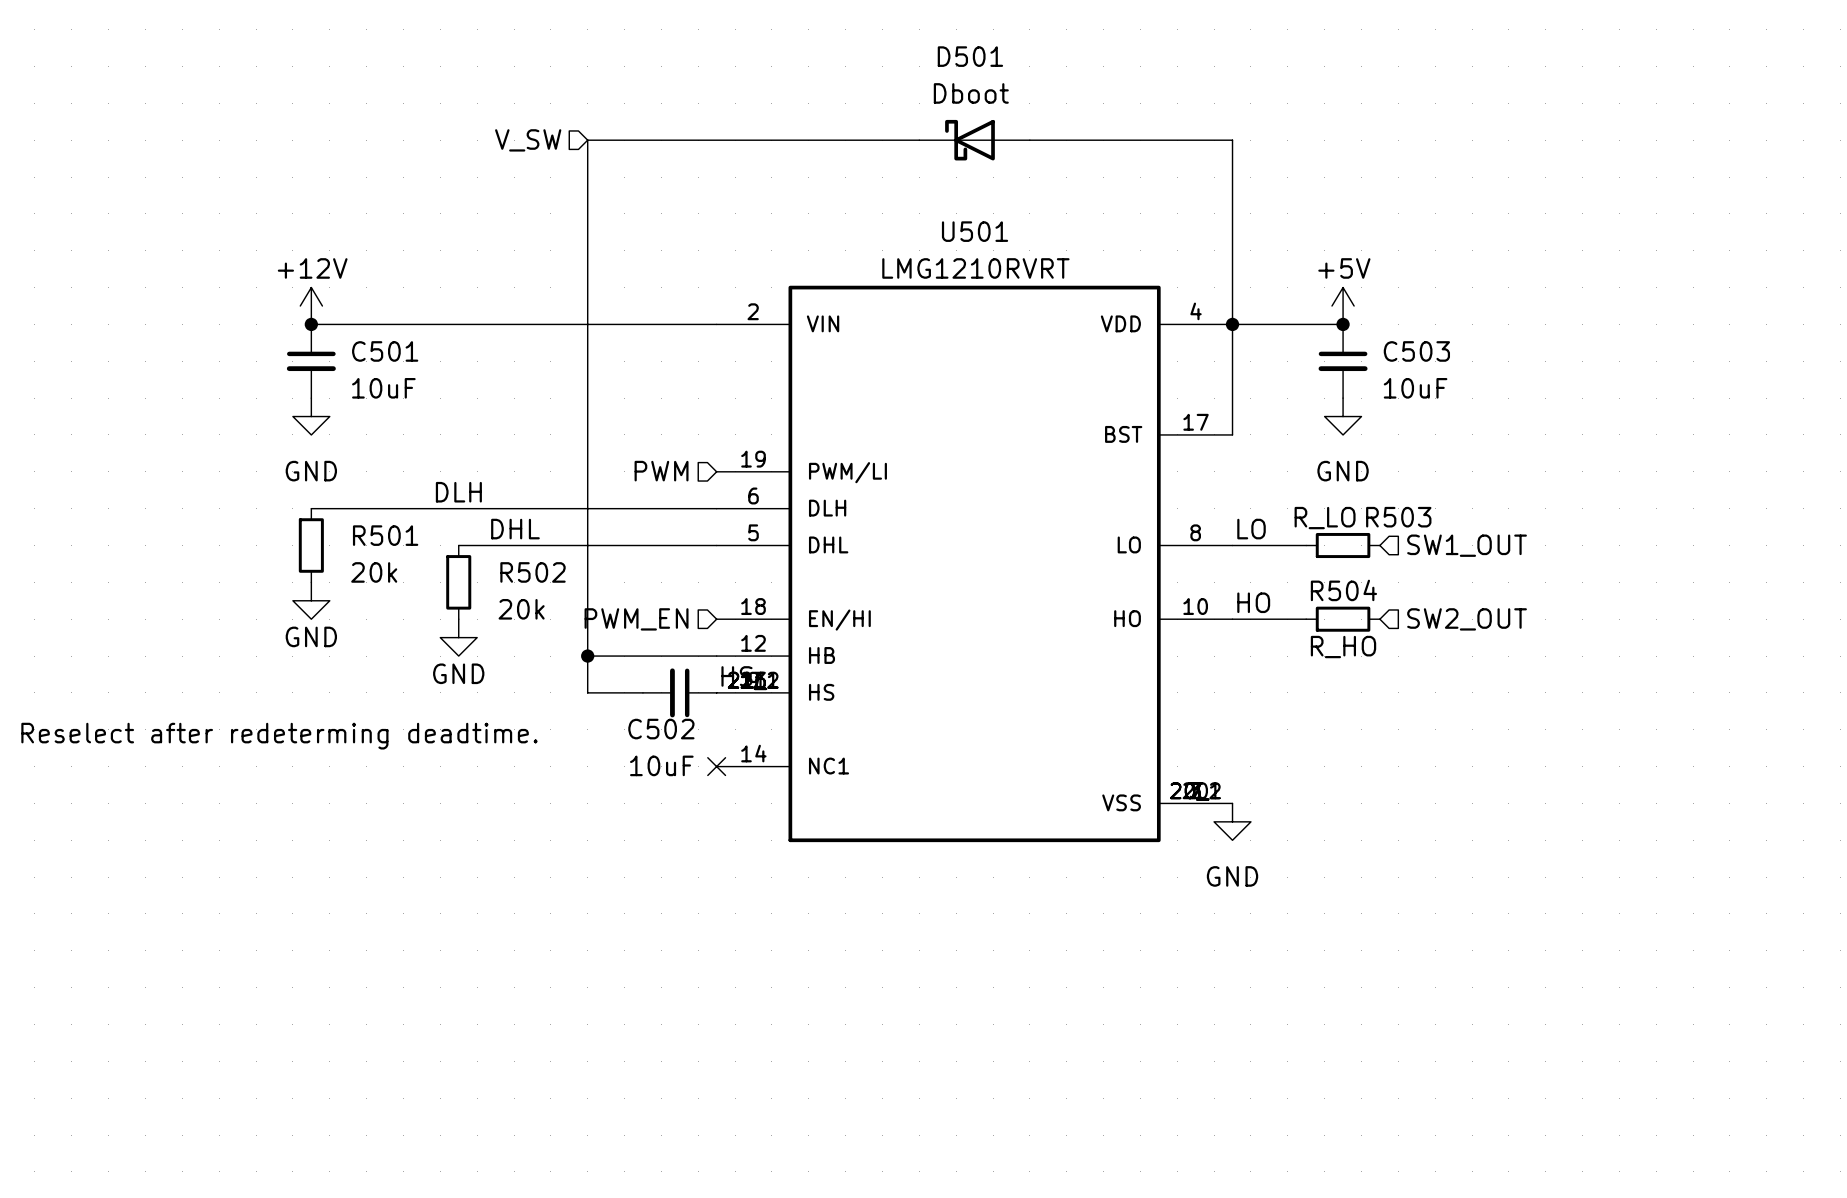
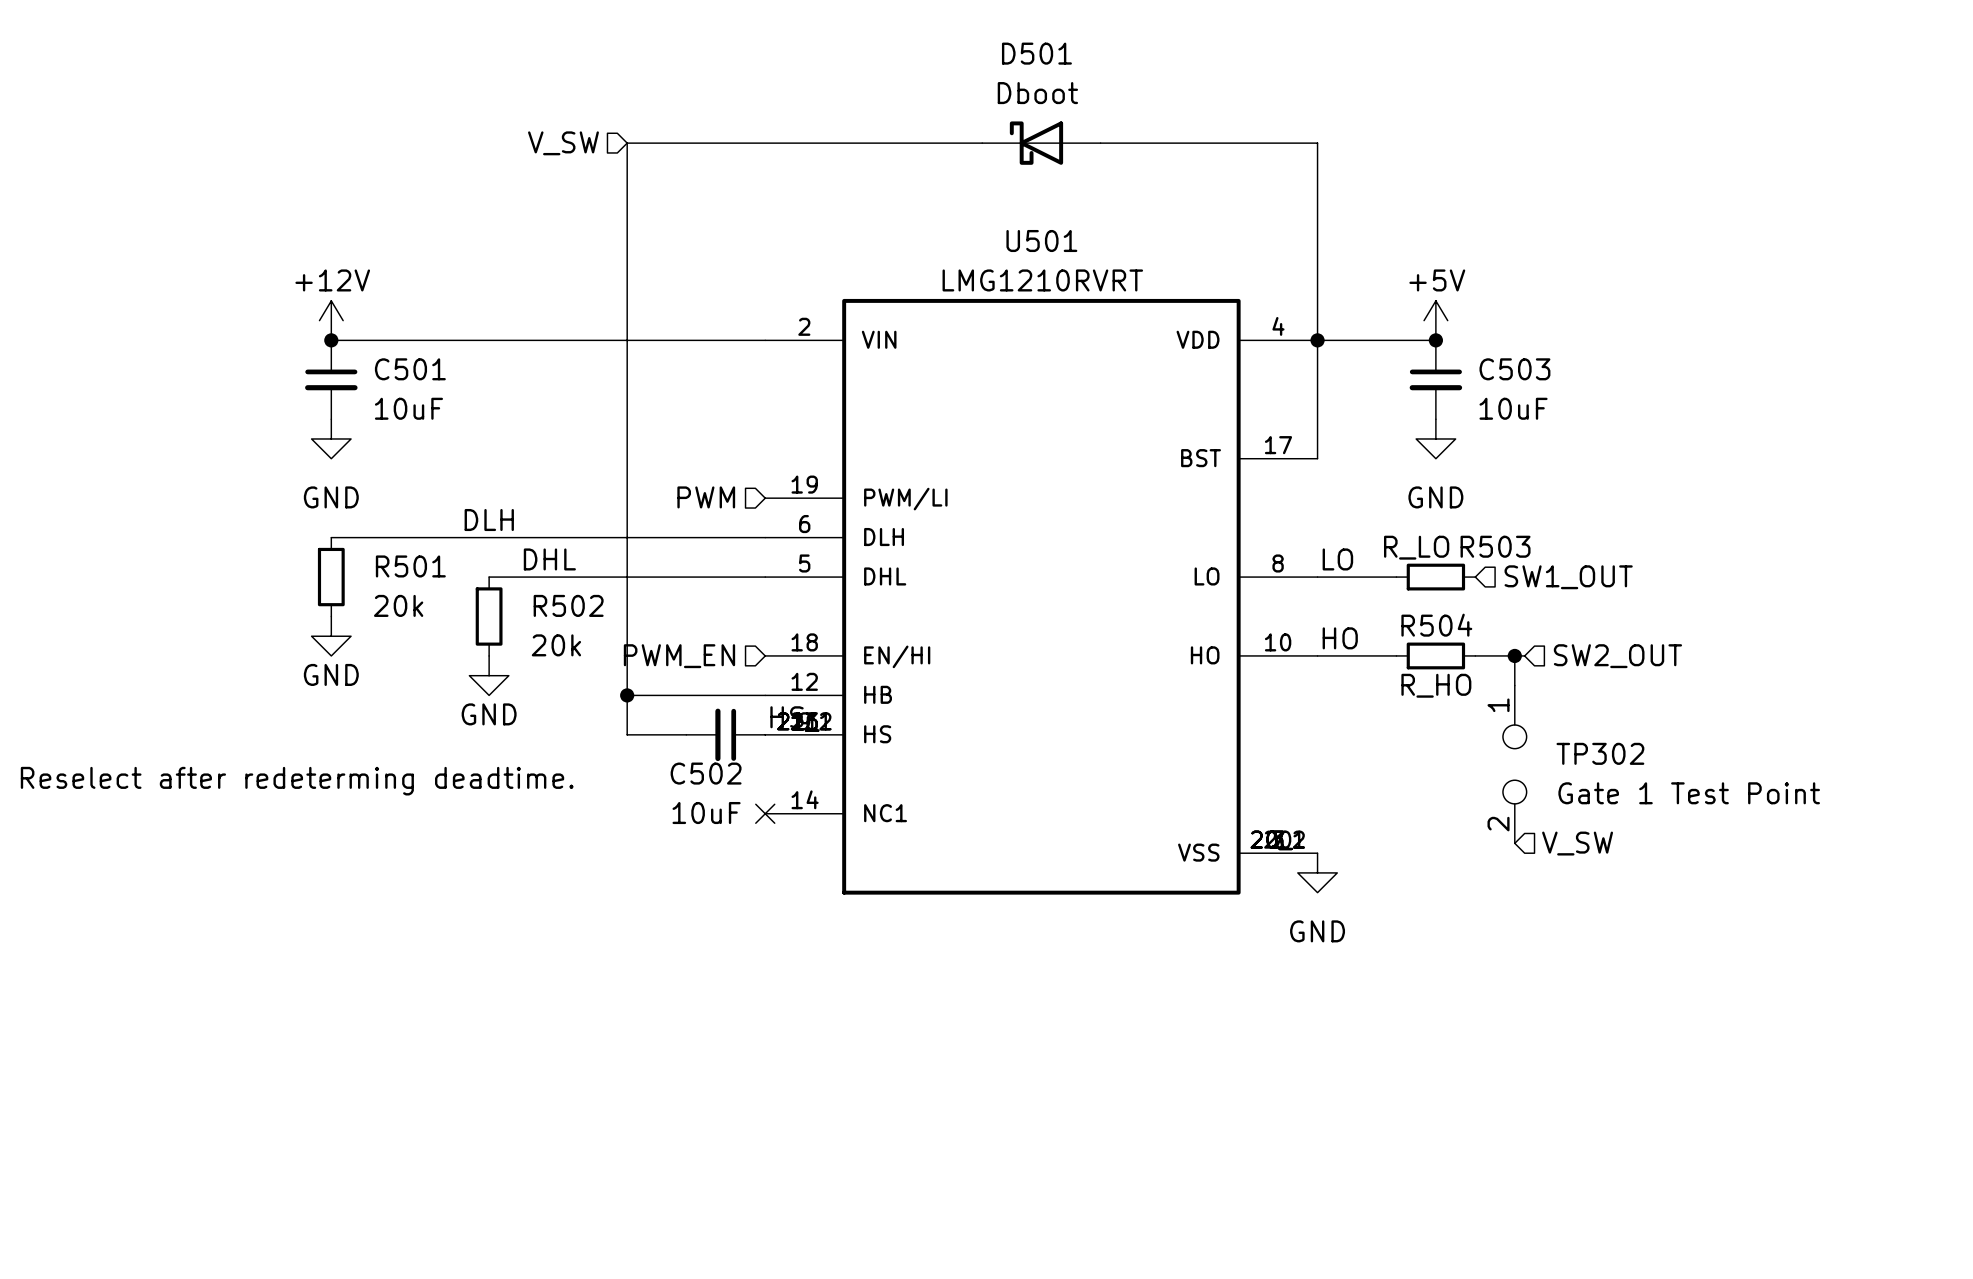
wire: none -> (1475, 655) (1524, 655)
wire: none -> (1514, 655) (1514, 685)
junction: none -> (1514, 655)
hierarchical label position: SW2_OUT (1467, 619) -> SW2_OUT (1617, 656)
TP302: none -> Gate 1 Test Point (1514, 764)
hierarchical label: none -> V_SW (1577, 843)

